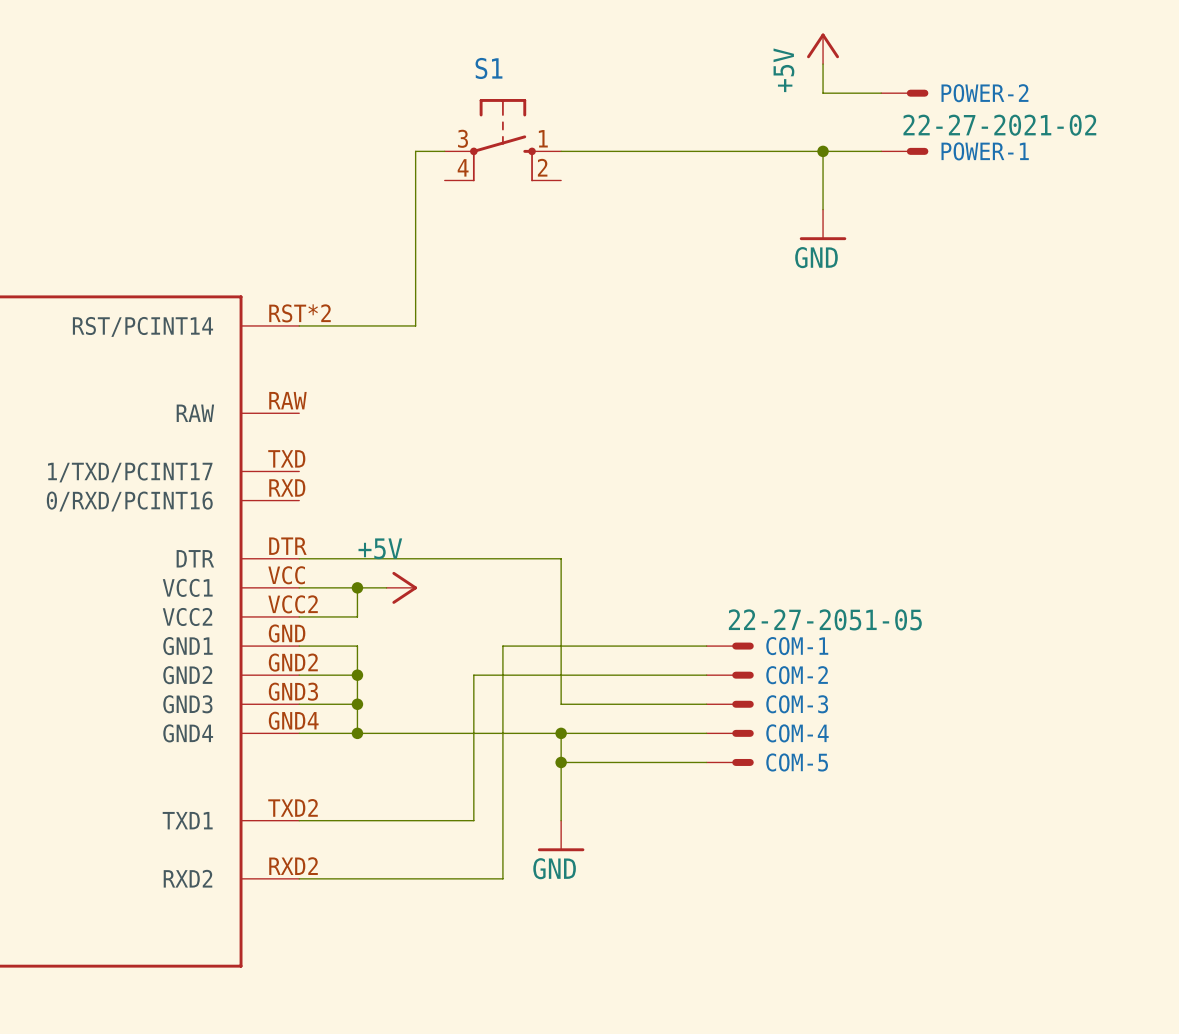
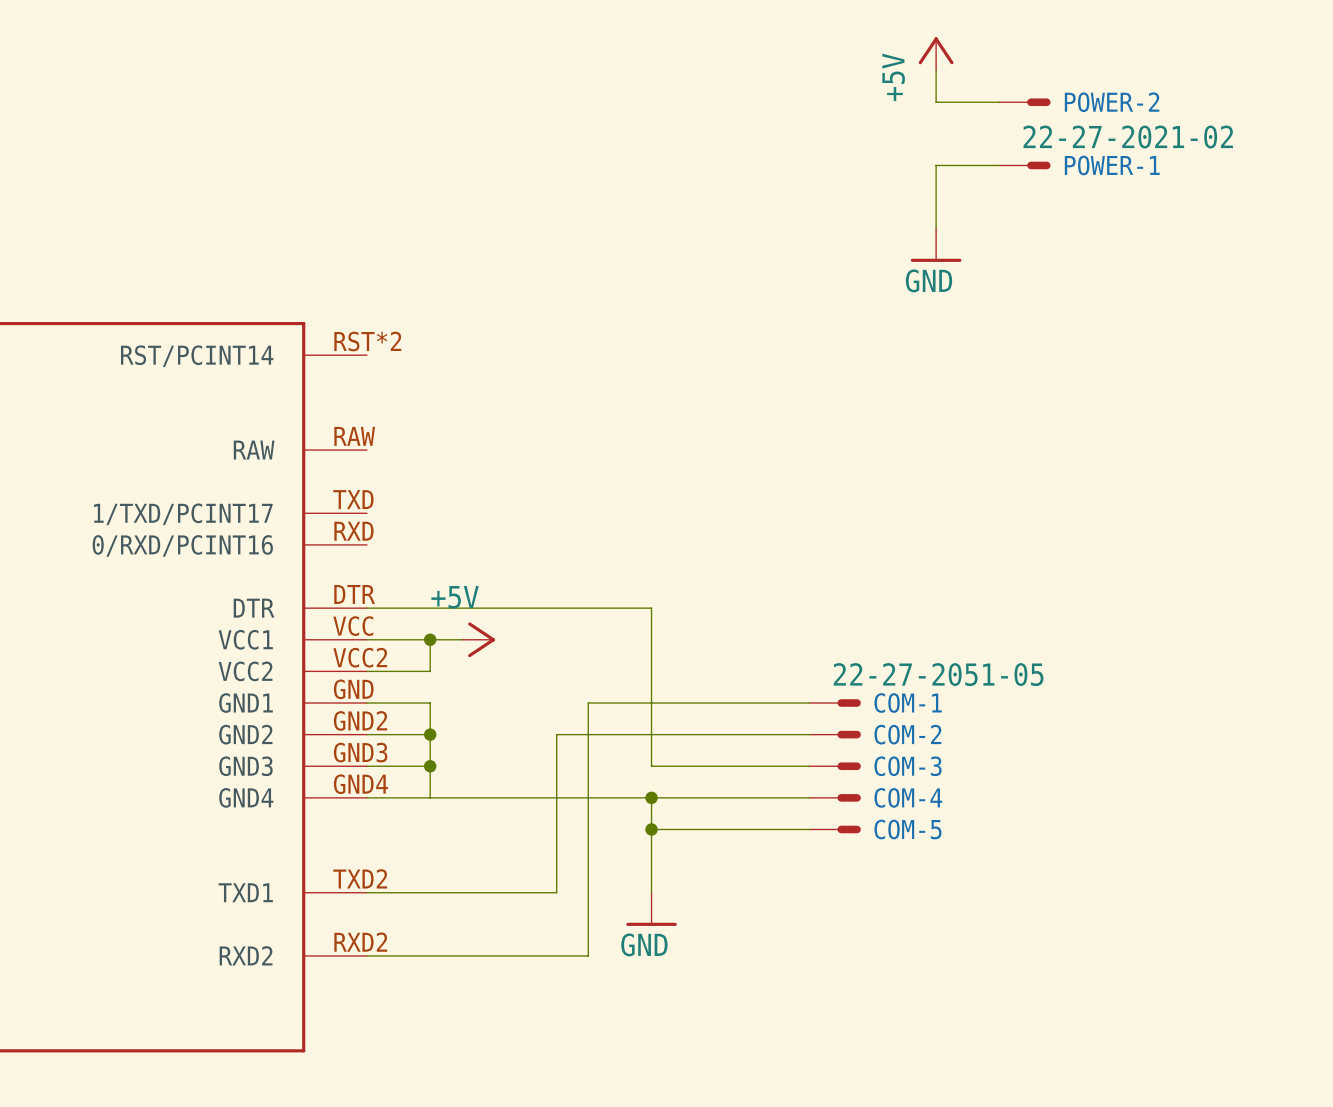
S1: (502, 140) -> none
wire: (444, 151) (415, 151) (415, 325) (299, 325) -> none
wire: (561, 151) (823, 151) -> none
junction: (823, 151) -> none
junction: (357, 733) -> none

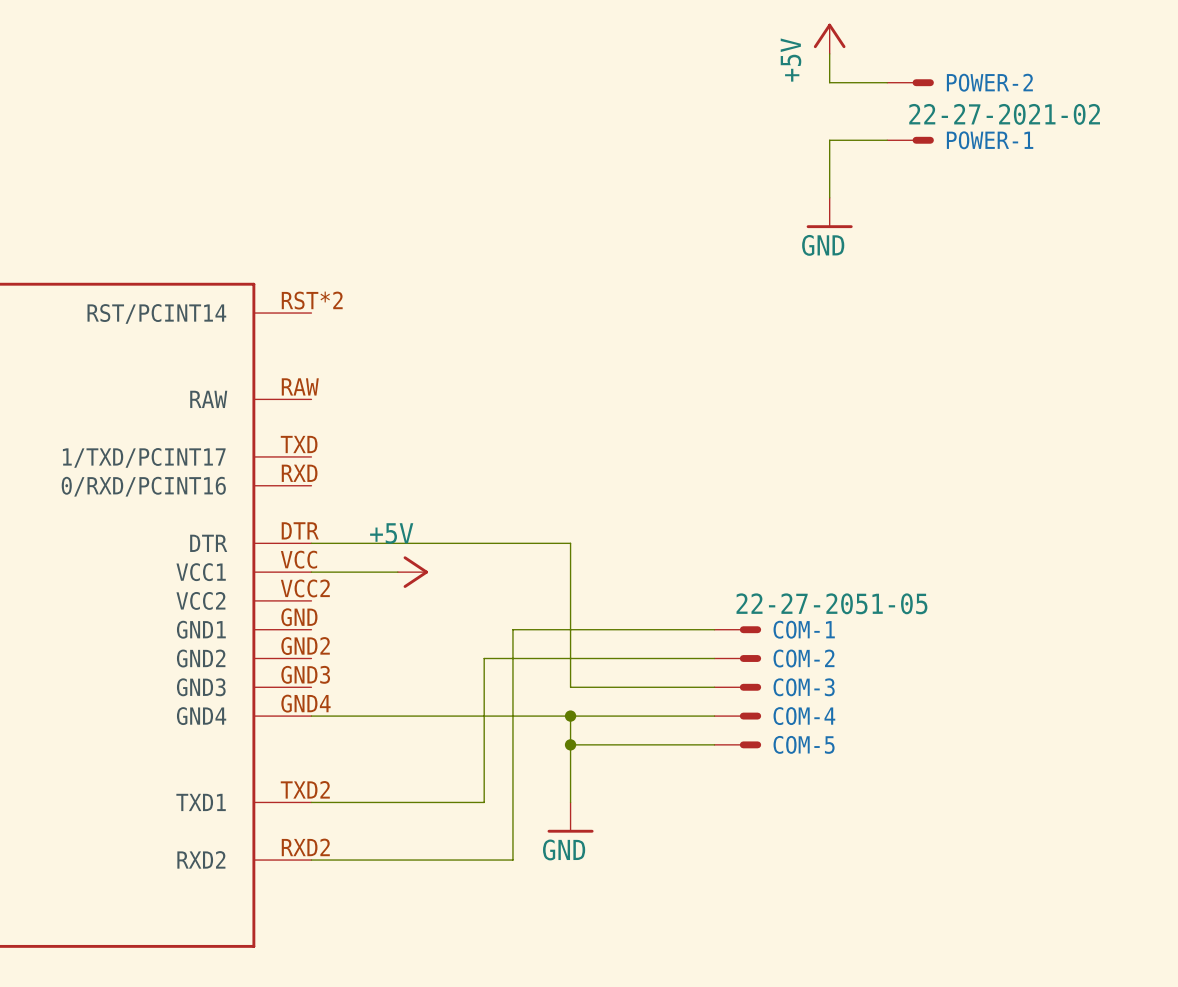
wire: (430, 639) (430, 671) (366, 671) -> none
junction: (430, 639) -> none
wire: (366, 703) (430, 703) (430, 797) -> none
wire: (366, 734) (430, 734) -> none
junction: (430, 734) -> none
wire: (366, 766) (430, 766) -> none
junction: (430, 766) -> none

